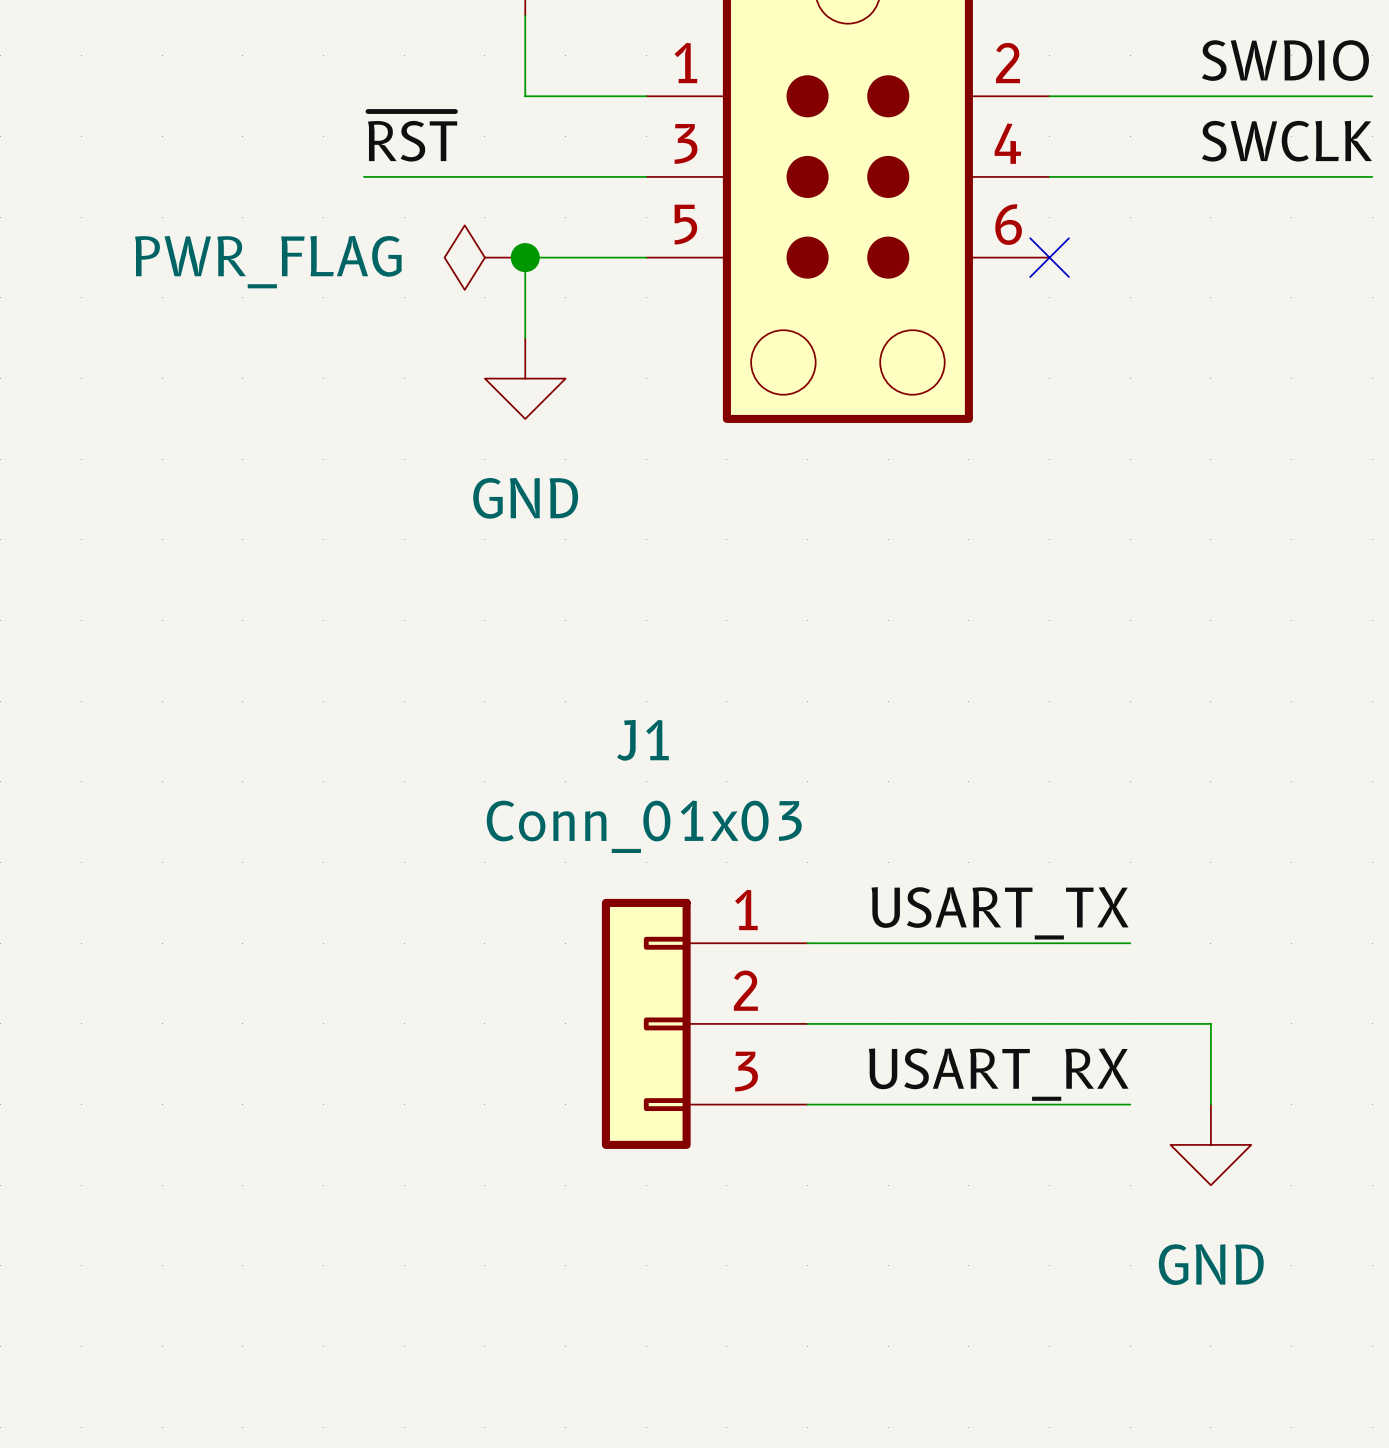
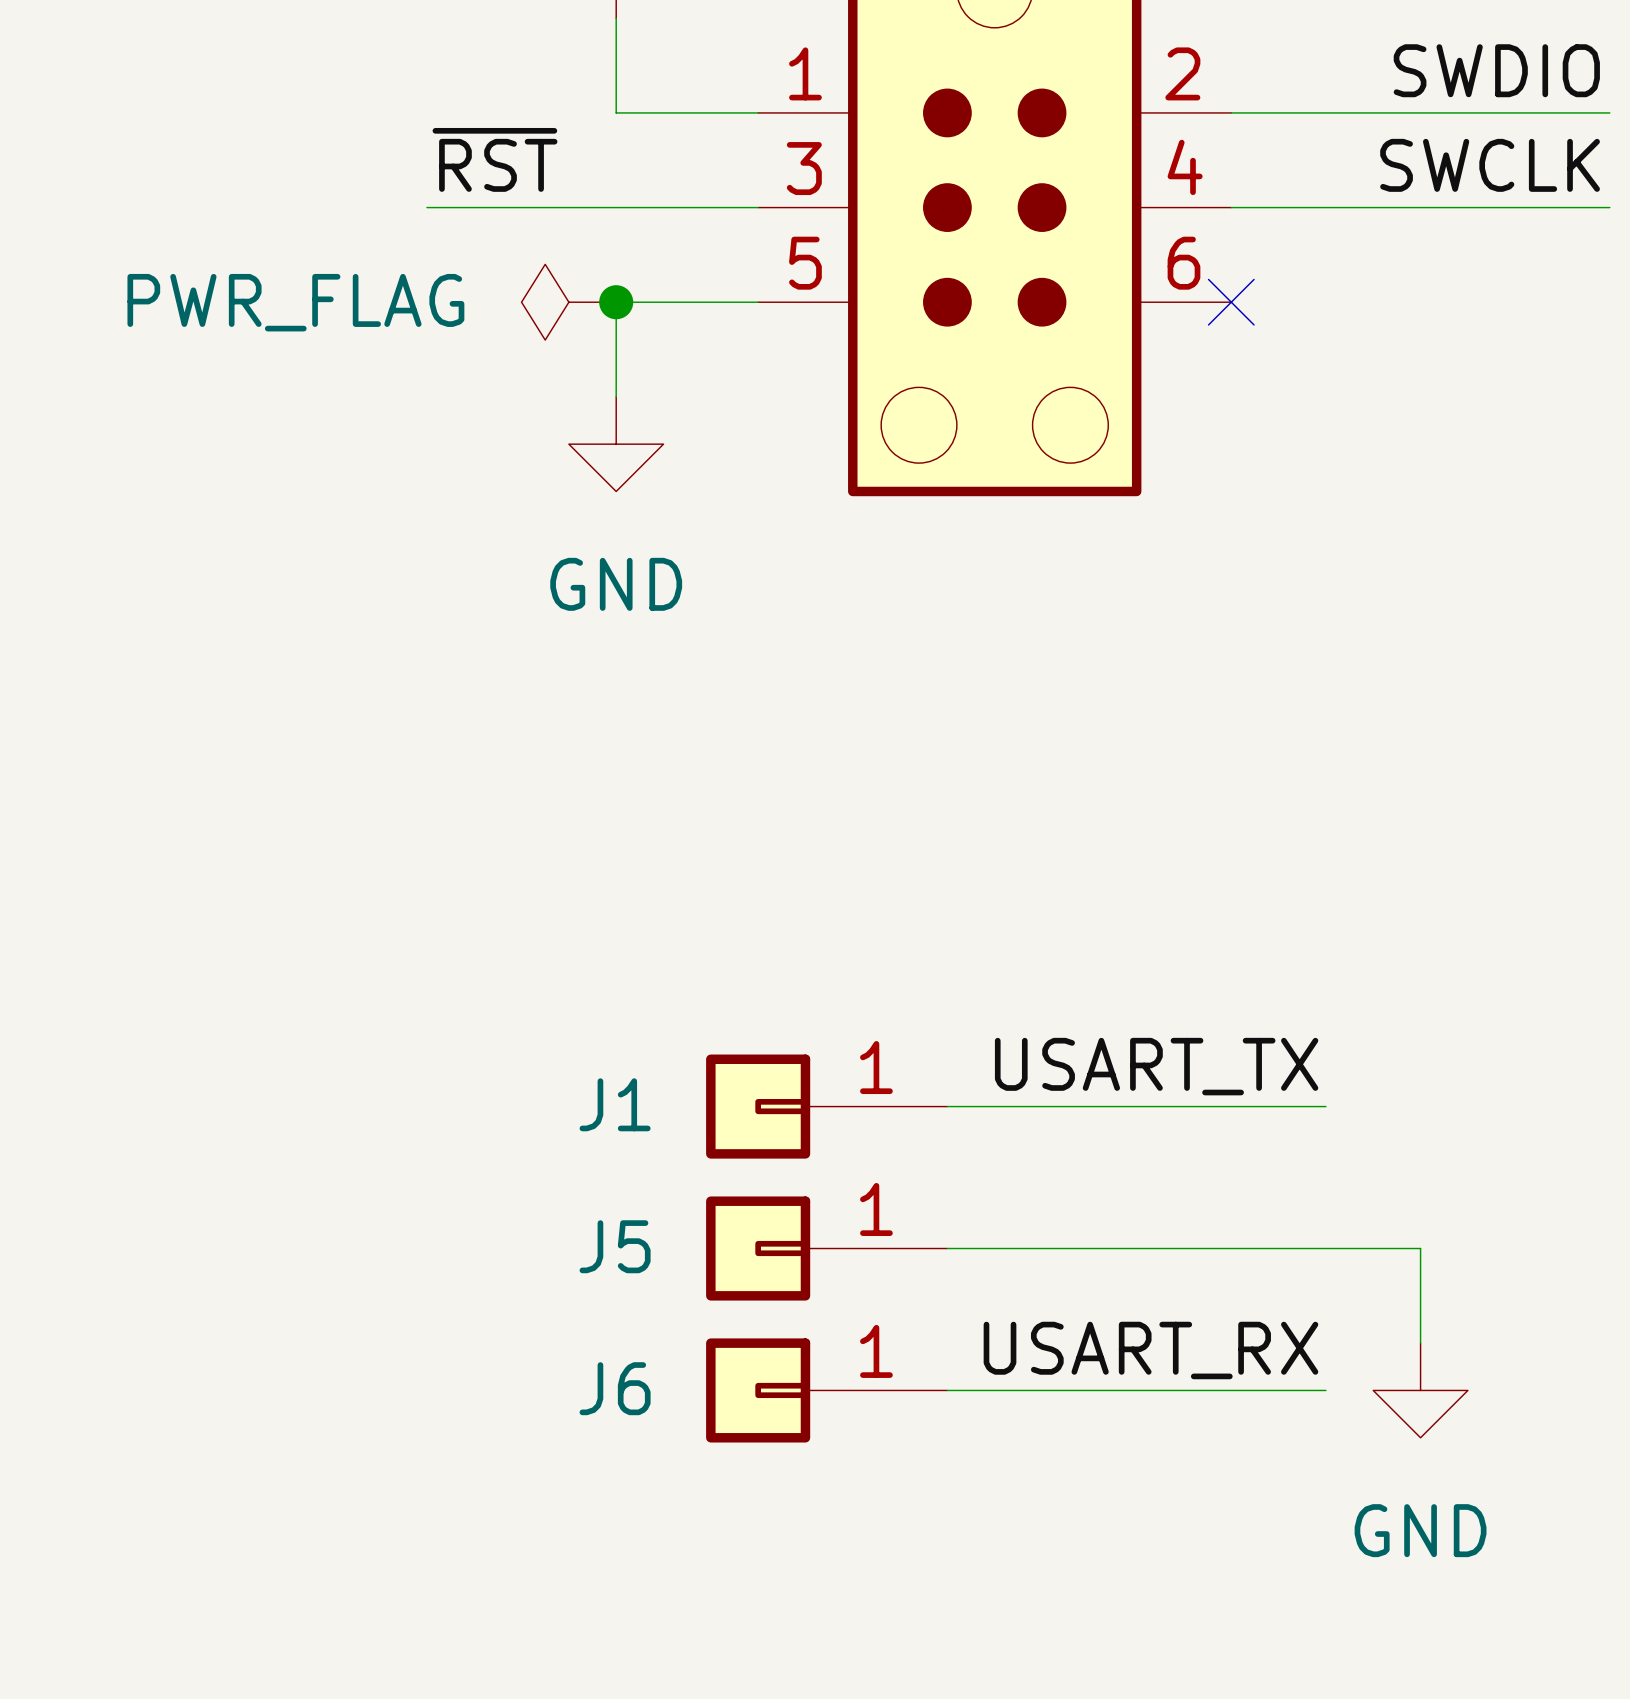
J1 name position: J1 (642, 740) -> J1 (615, 1104)
J1 value: Conn_01x03 (644, 826) -> none
J1 symbol: [601, 898, 808, 1149] -> [706, 1054, 948, 1159]
wire: (807, 1023) (1210, 1023) (1210, 1064) -> (947, 1248) (1420, 1248)
J5: none -> (826, 1248)
label position: USART_RX (998, 1074) -> USART_RX (1150, 1350)
wire: (807, 1104) (1130, 1104) -> (947, 1390) (1325, 1390)
power symbol position: GND (1210, 1144) -> GND (1420, 1390)
J6: none -> (826, 1390)

